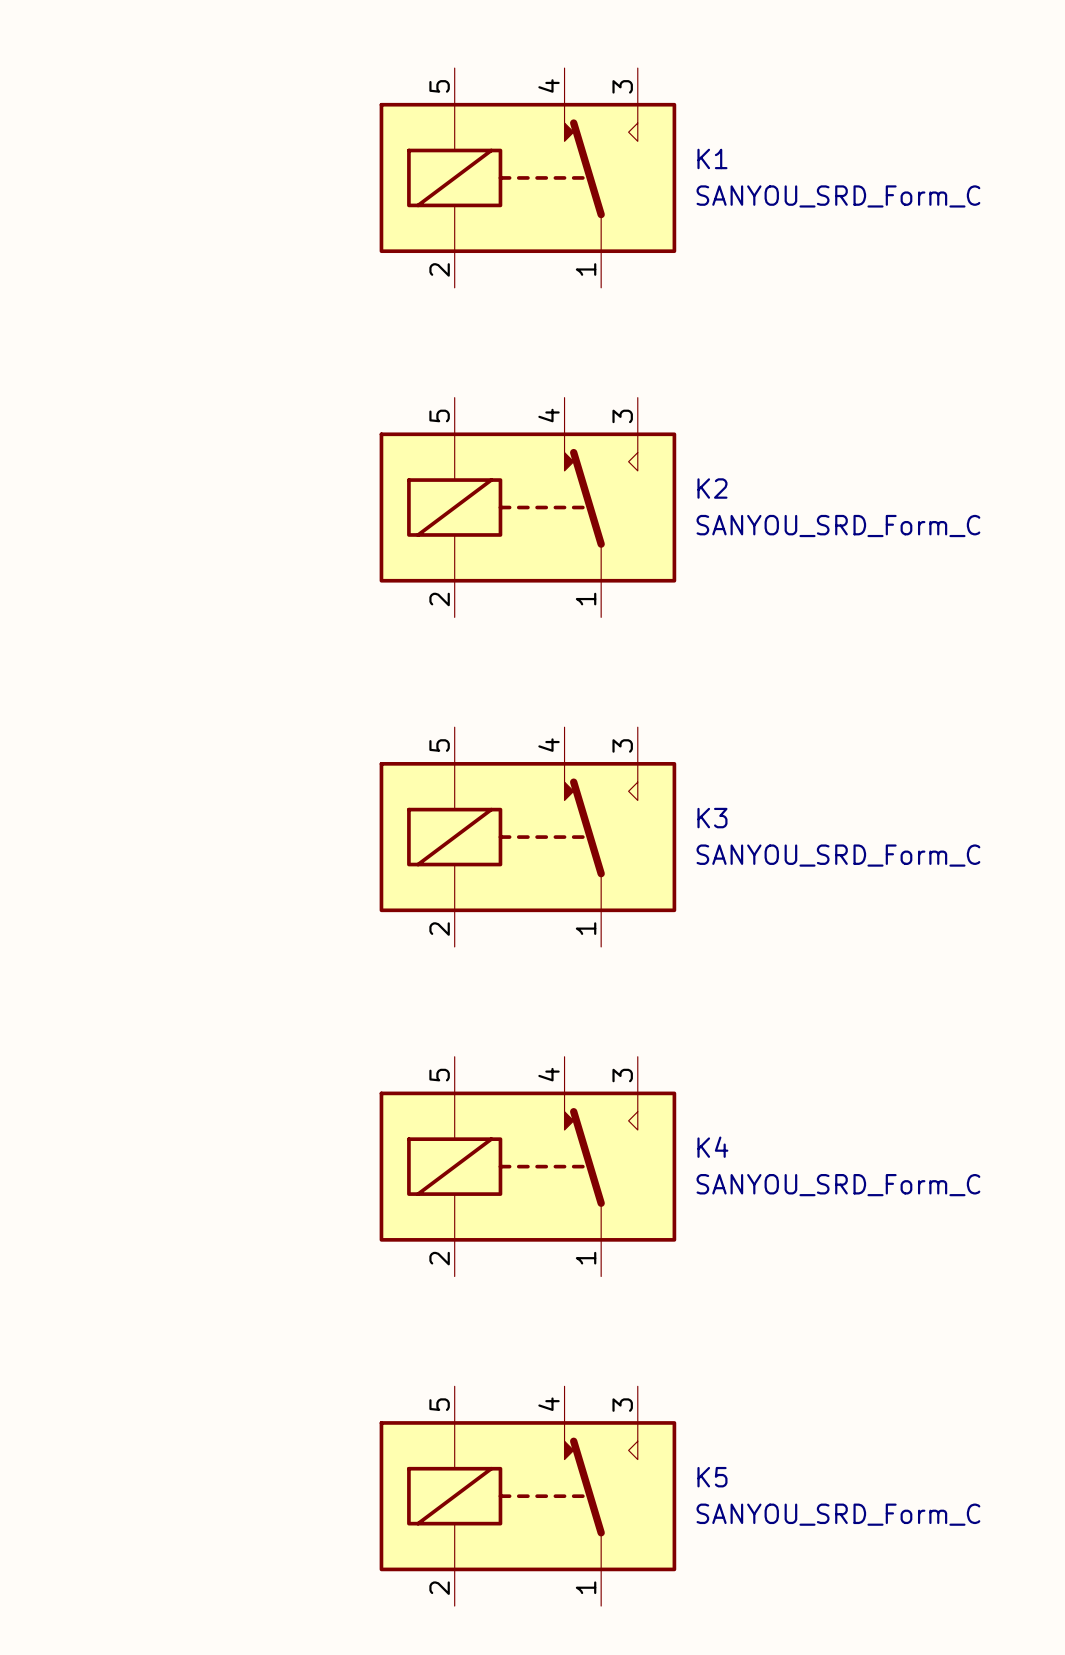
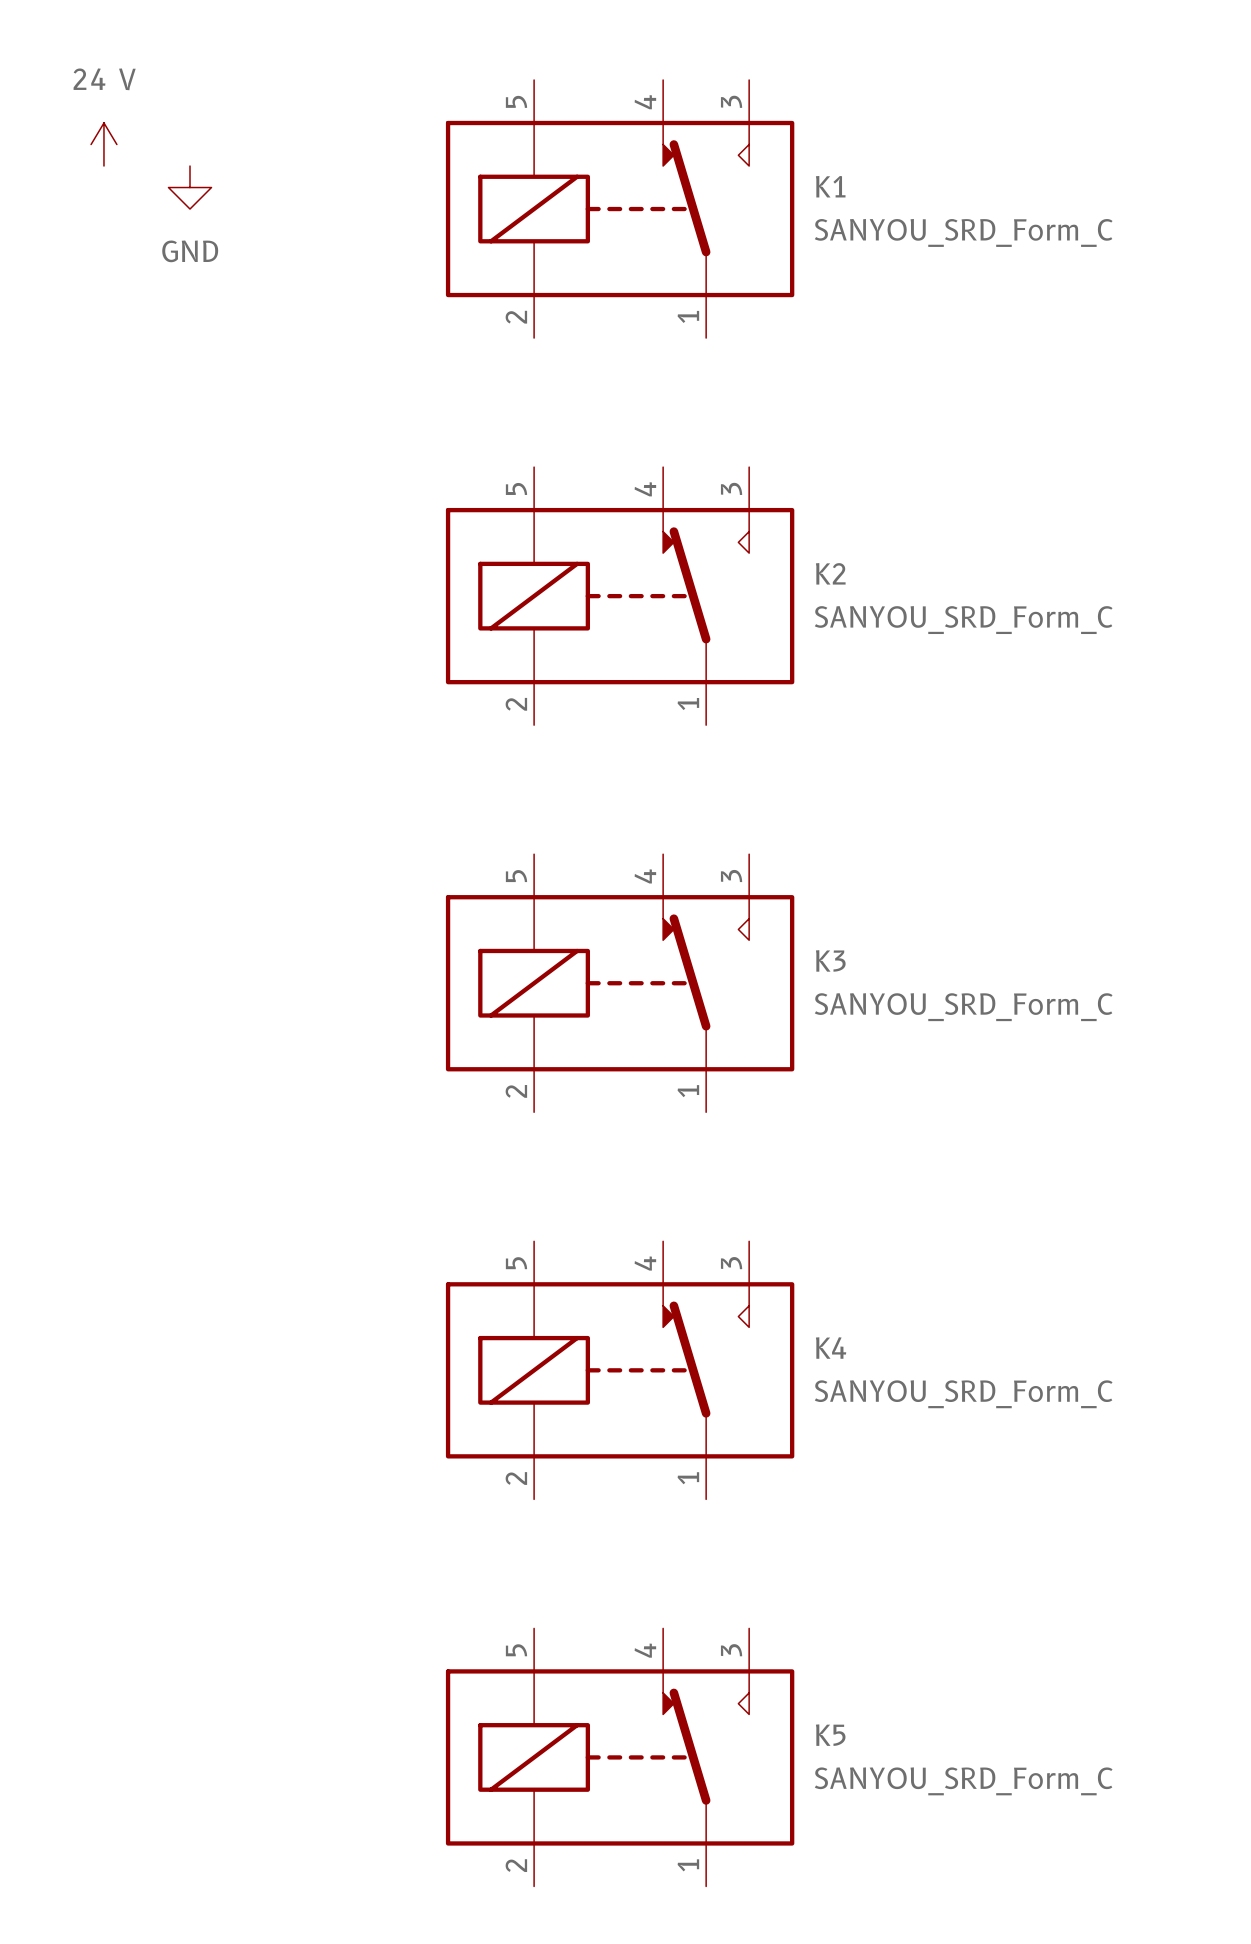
power symbol: none -> 24 V (103, 144)
power symbol: none -> GND (190, 187)

